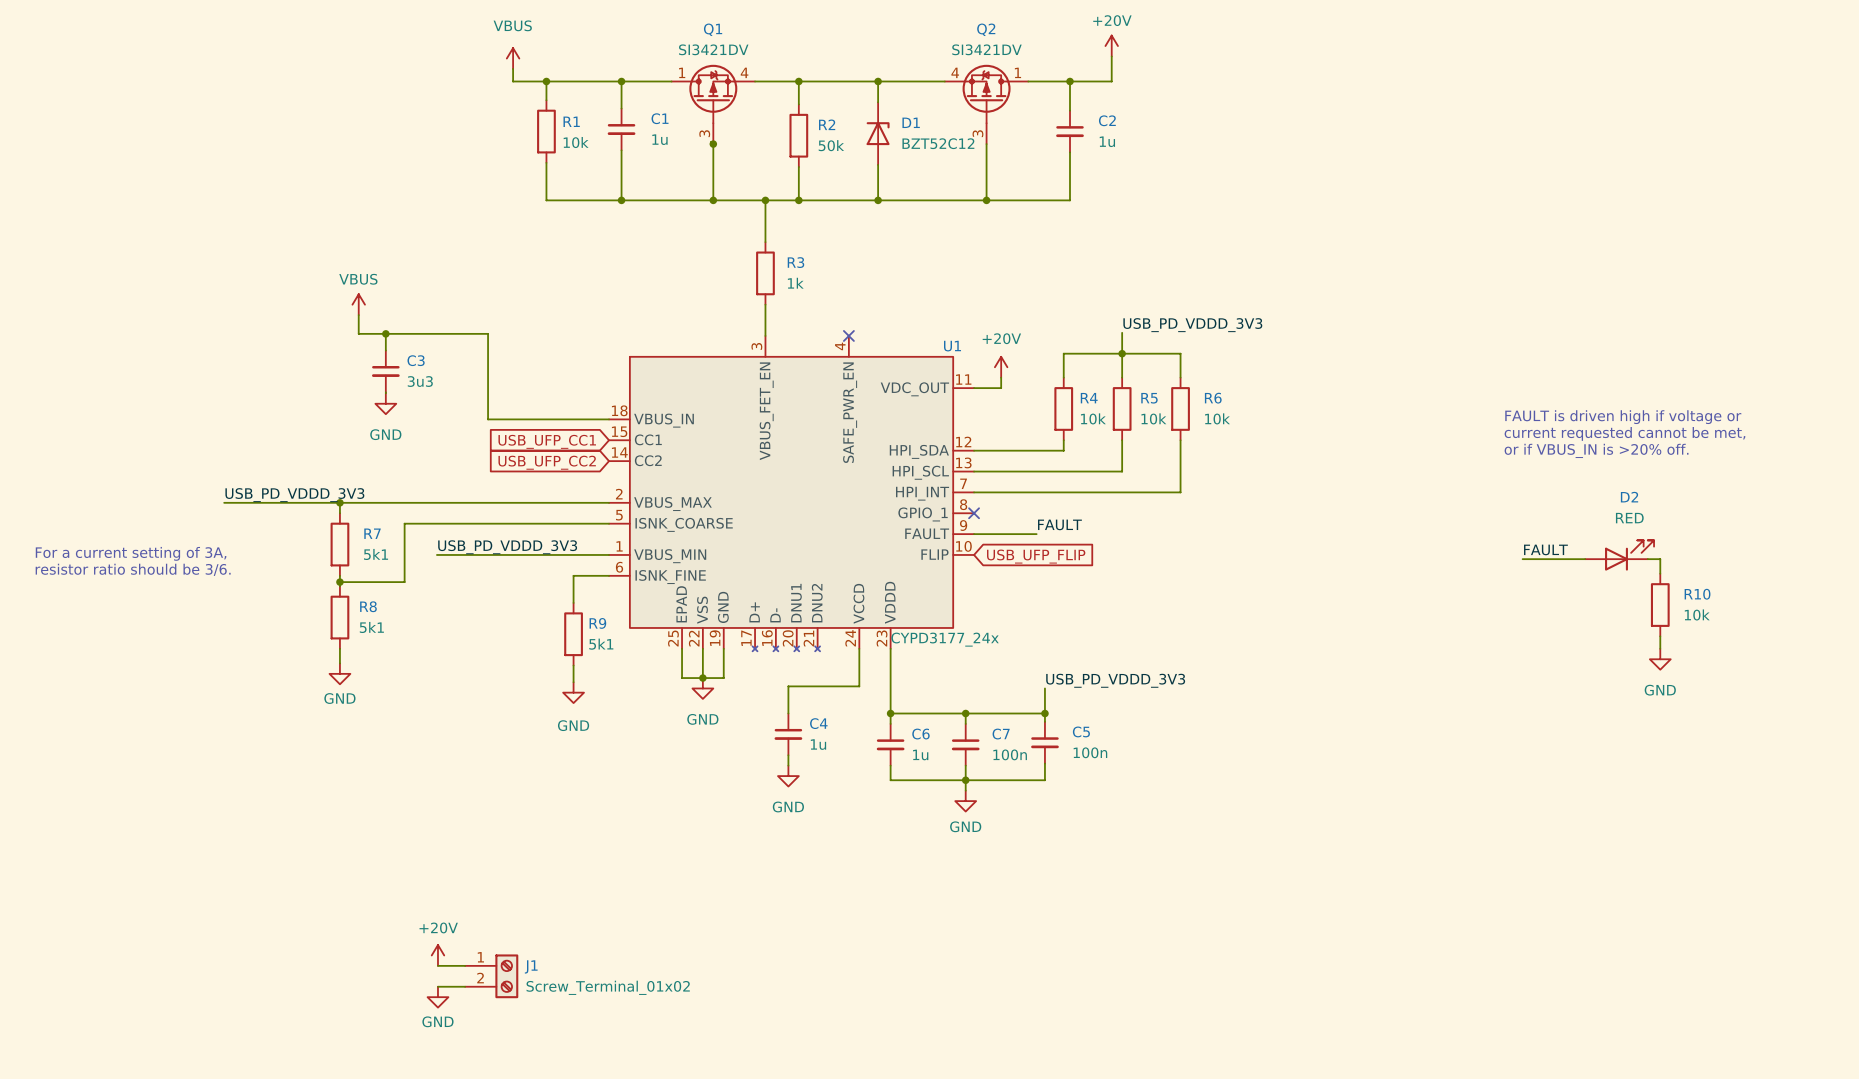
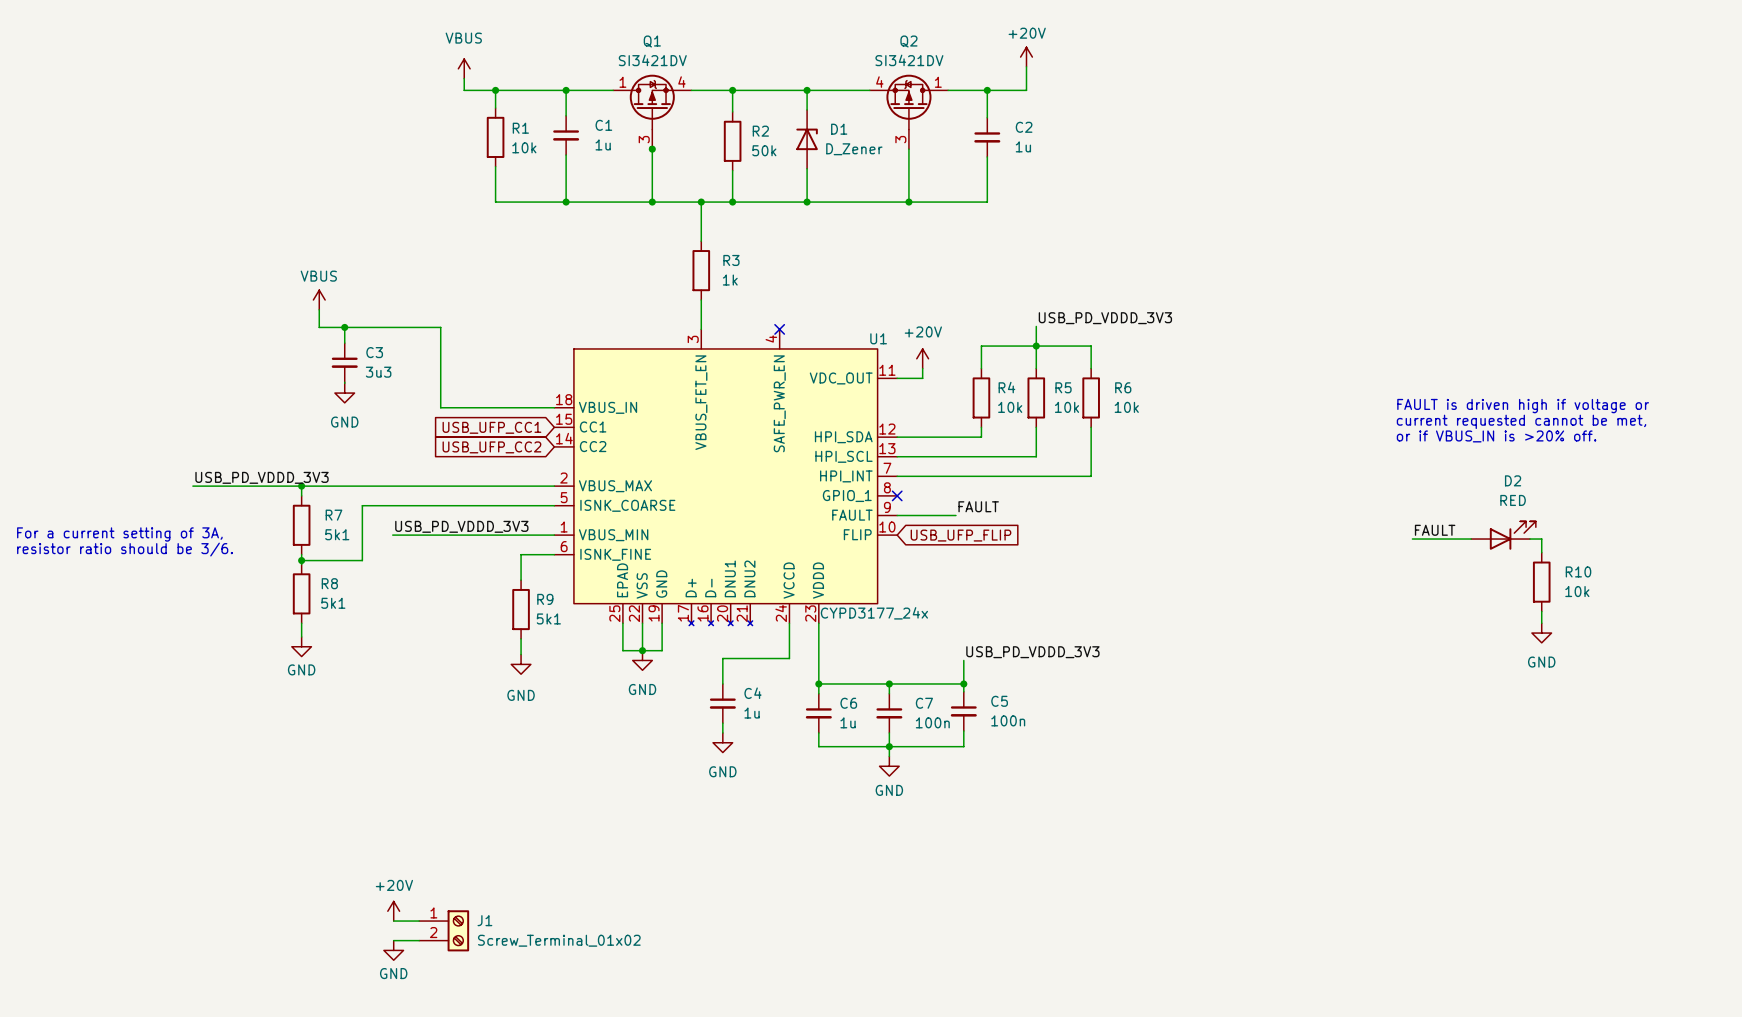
D1 value: BZT52C12 (938, 143) -> D_Zener (854, 149)

